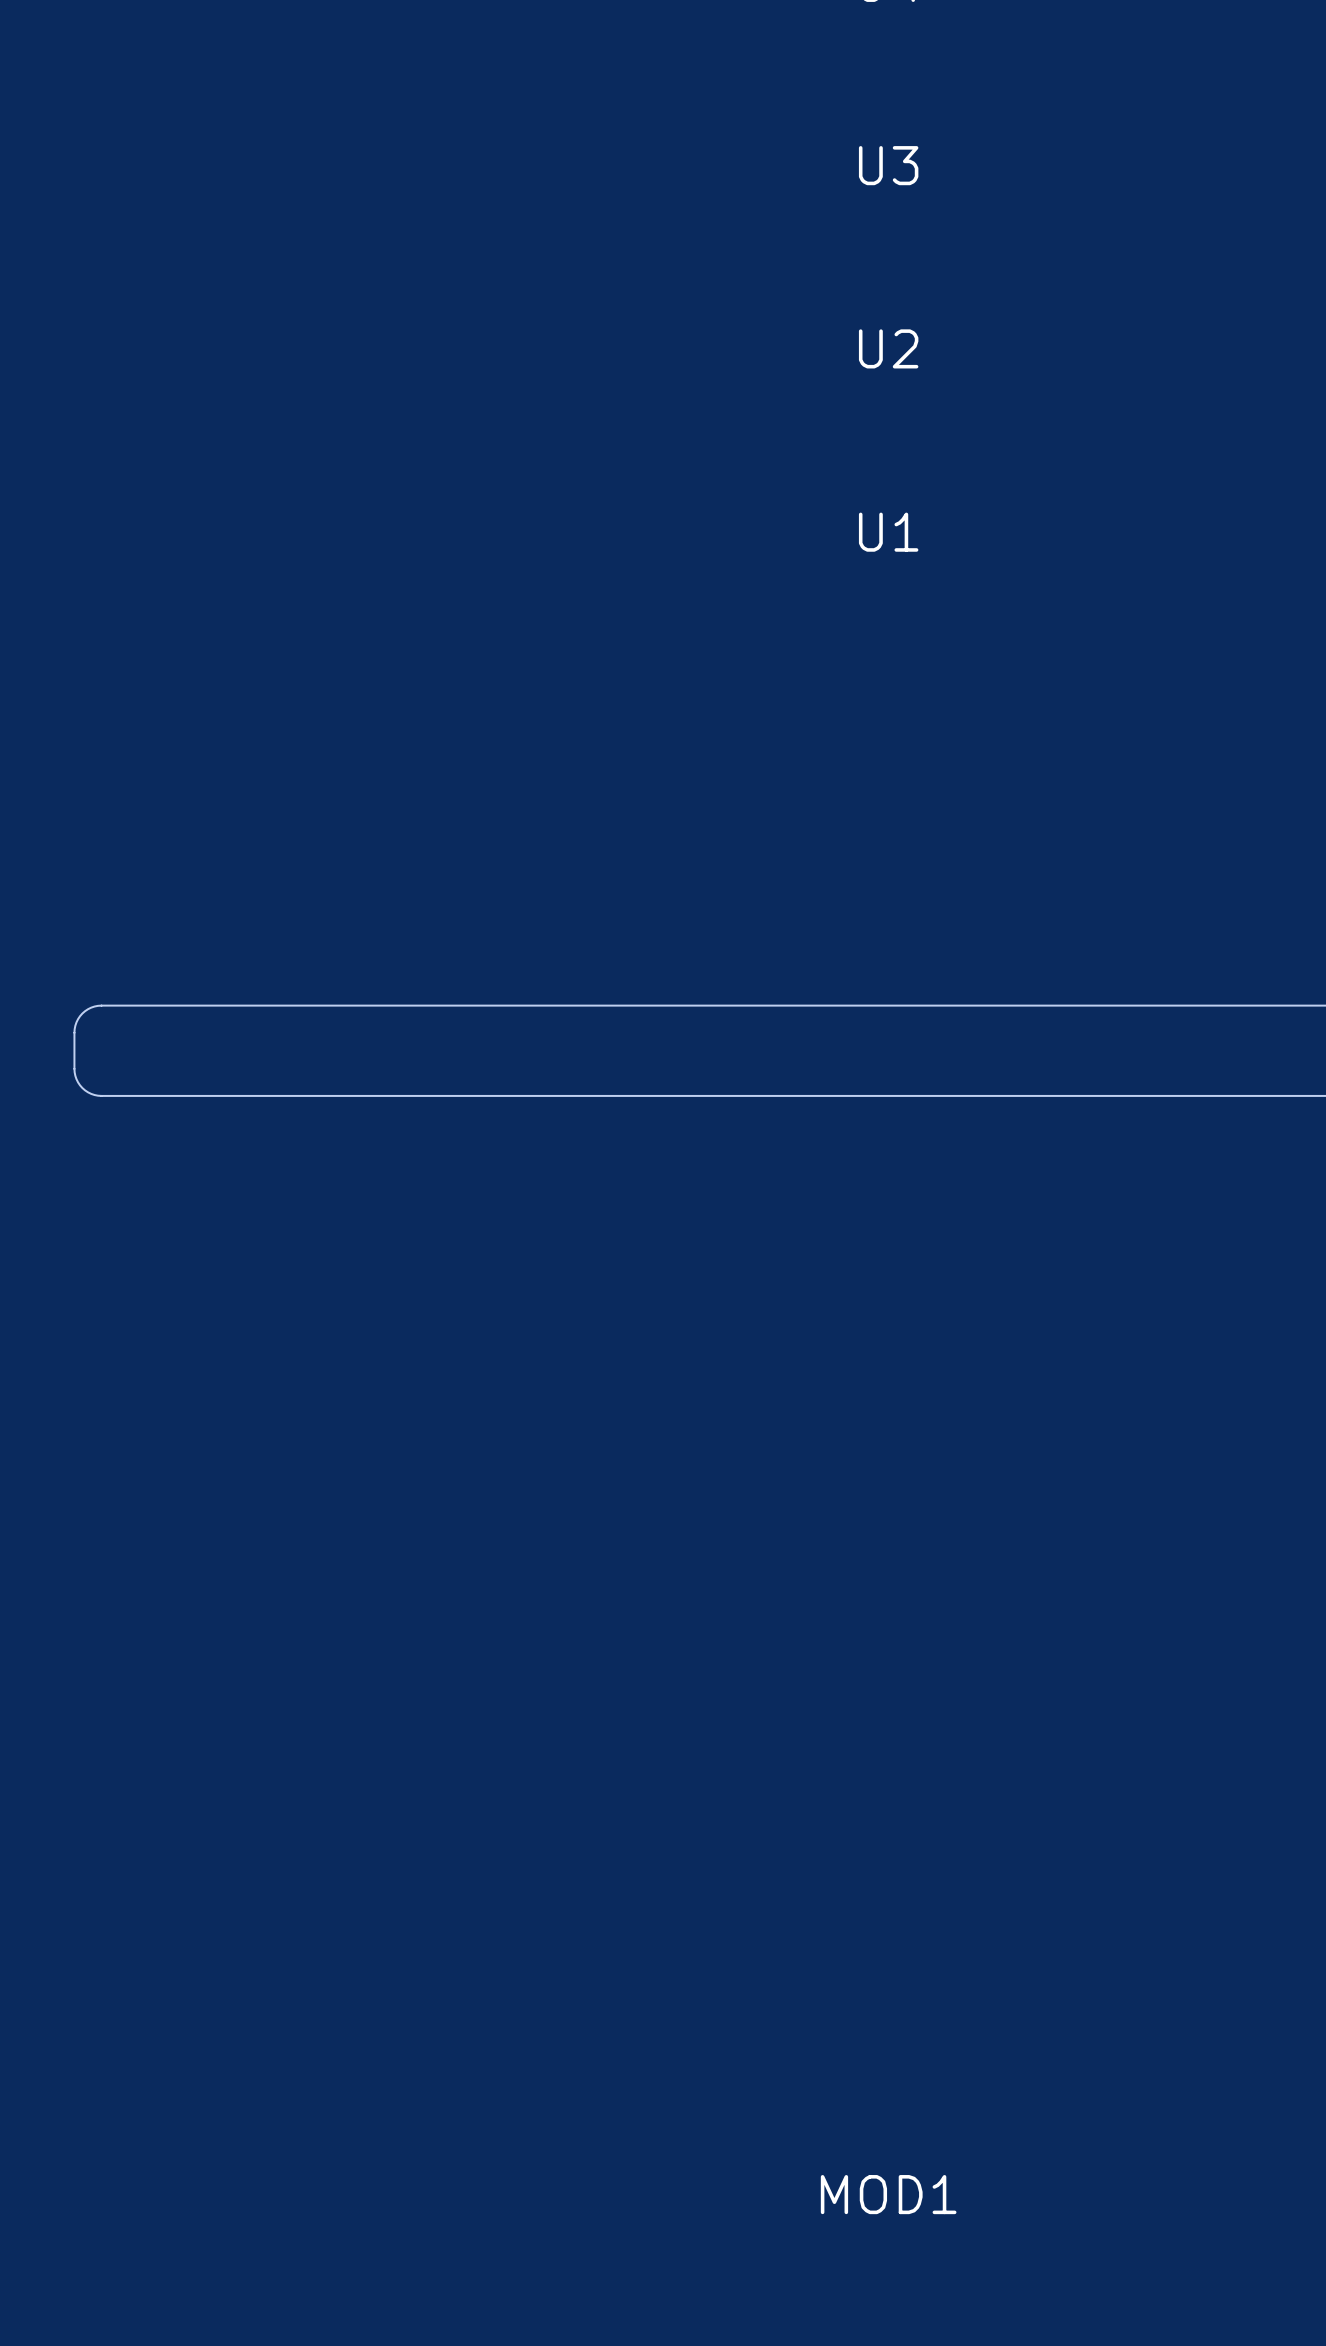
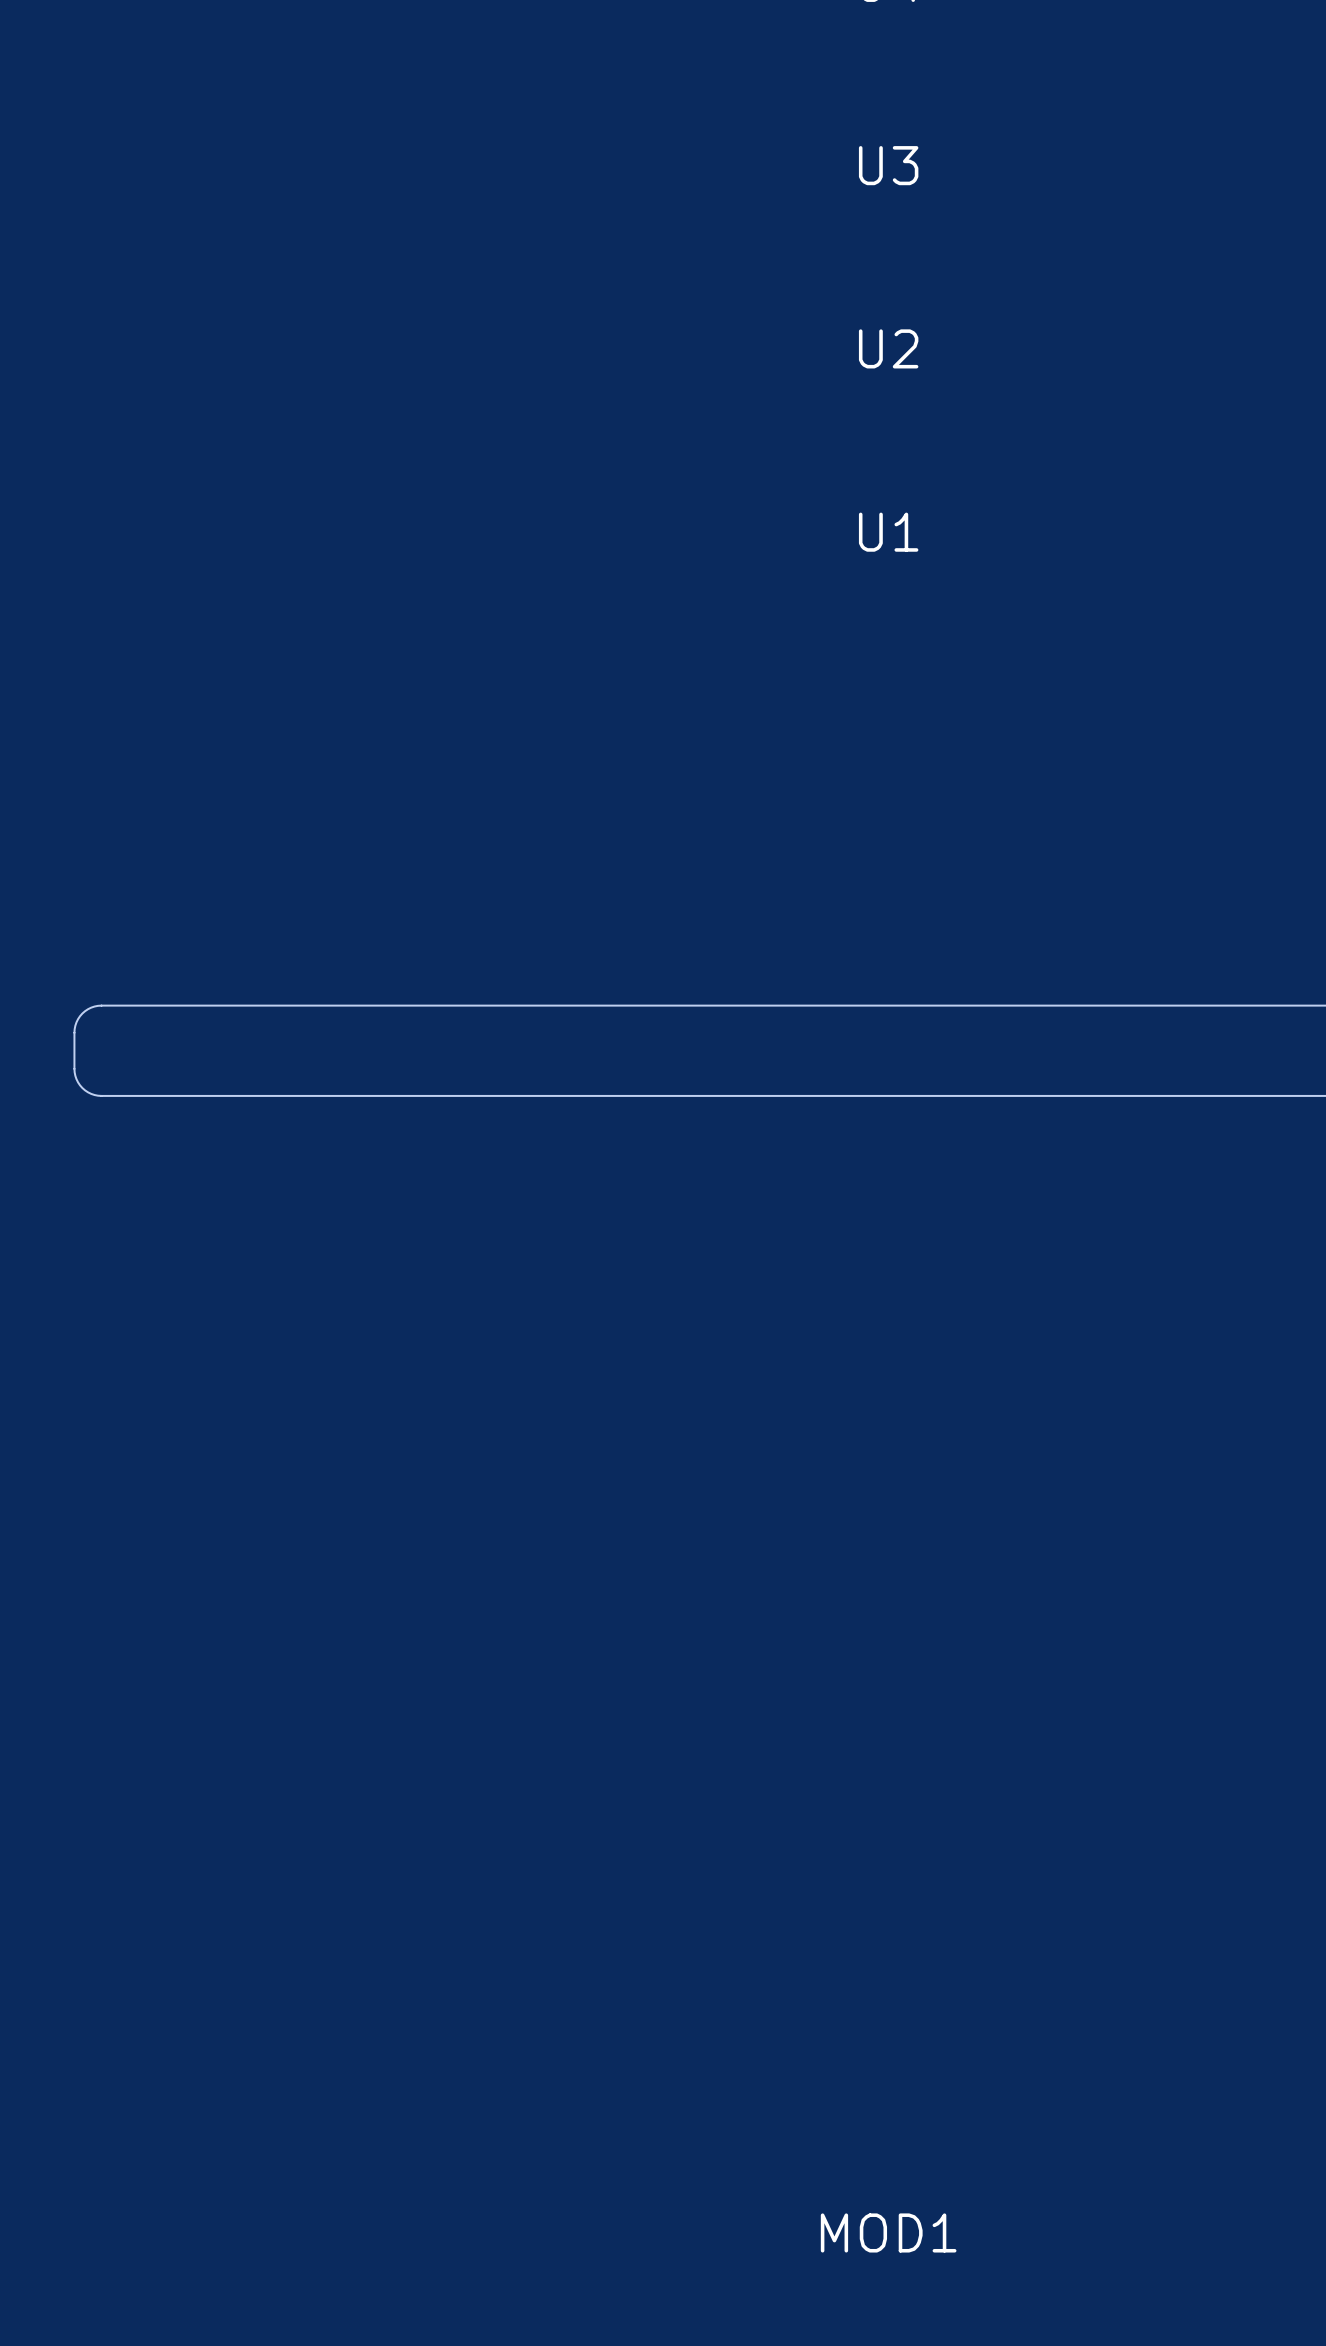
MOD1 position: (888, 2194) -> (888, 2232)

